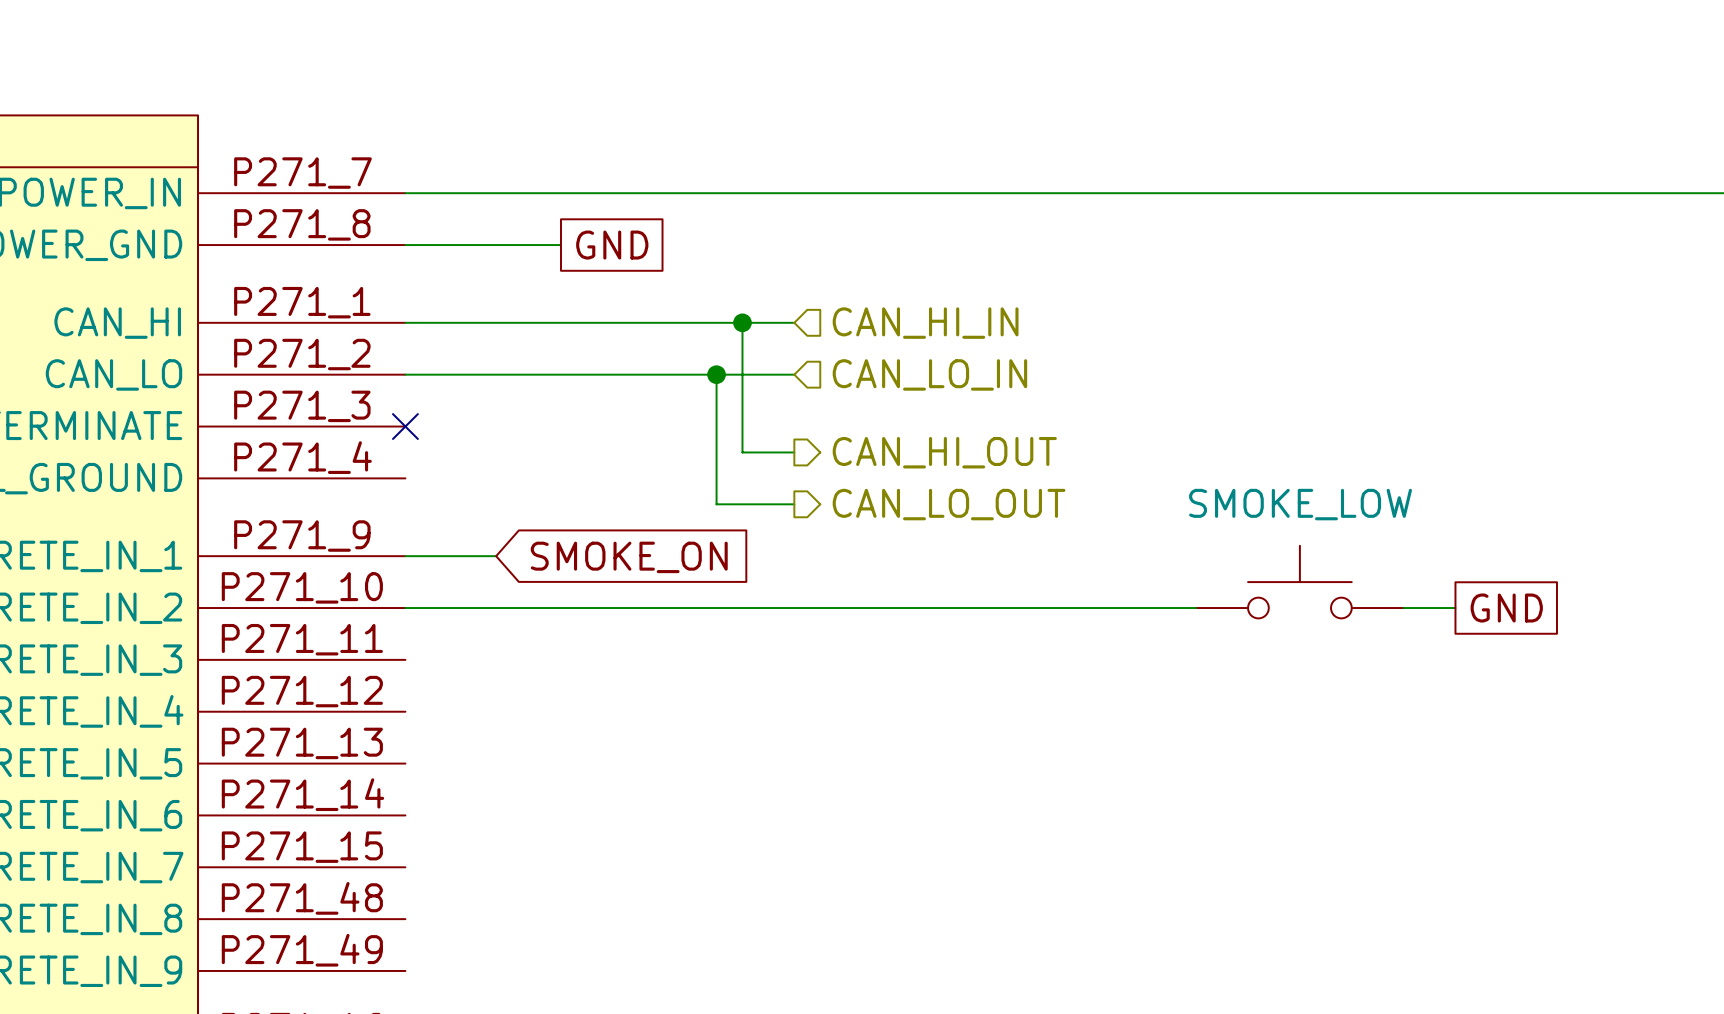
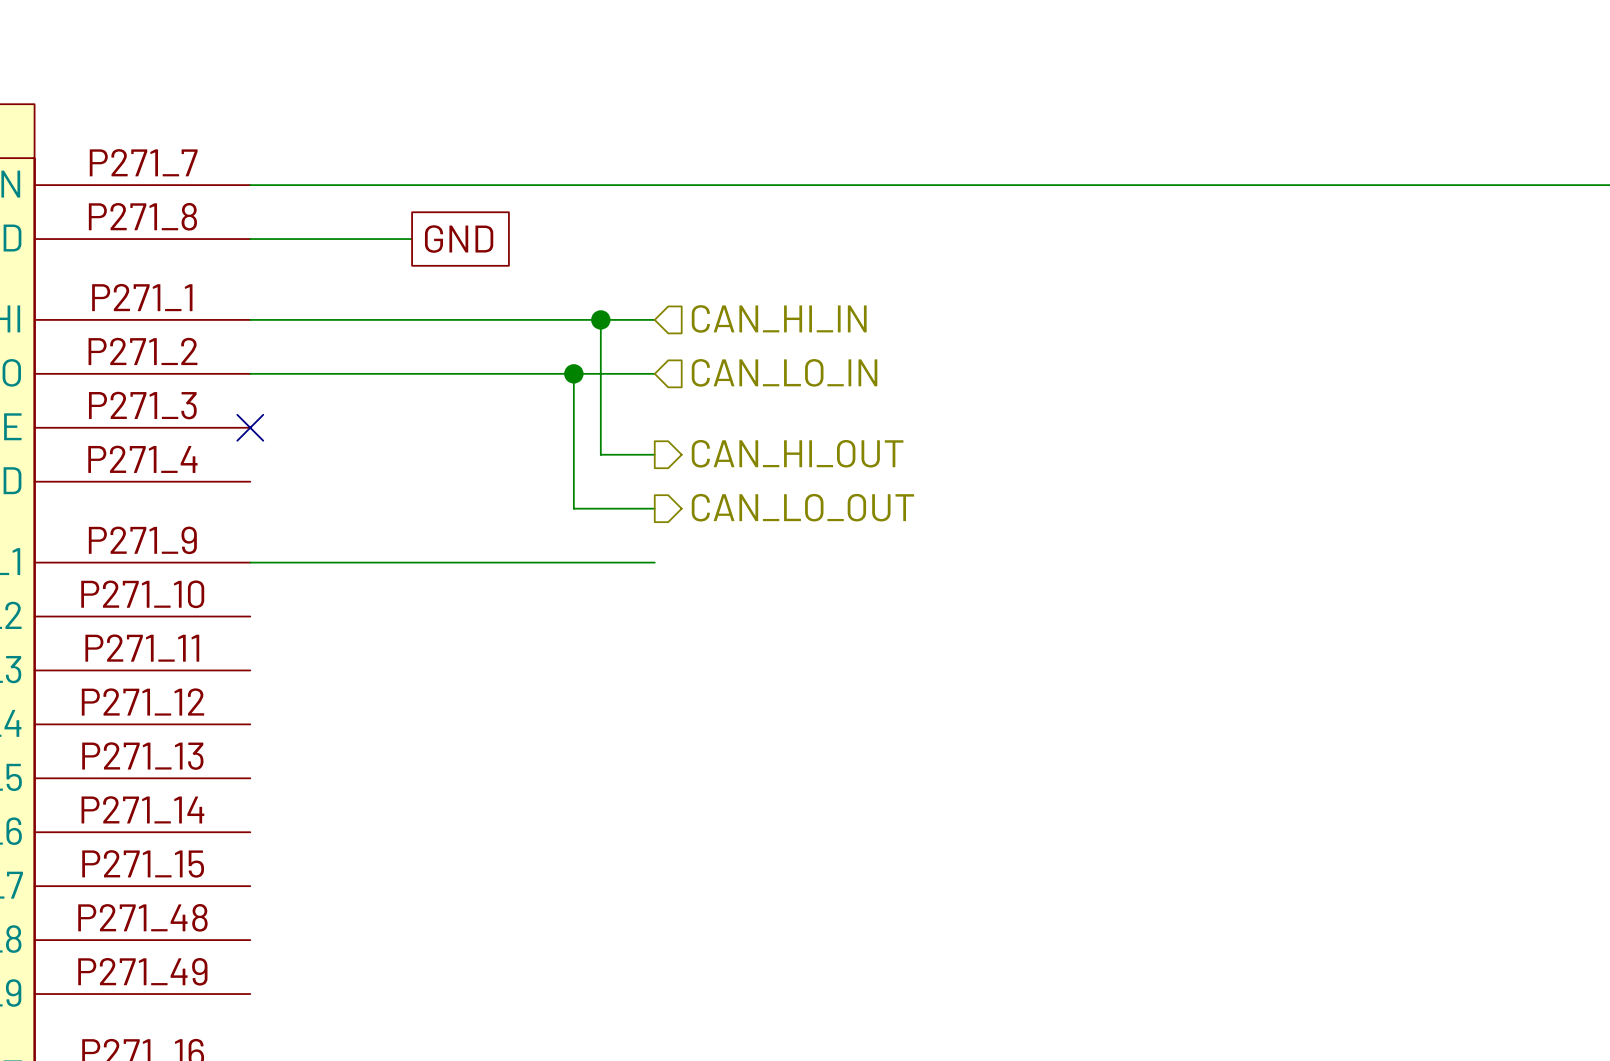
wire: none -> (344, 562) (654, 562)
global label: SMOKE_ON (629, 557) -> none
SMOKE_LOW: (1299, 582) -> none
wire: (405, 608) (1196, 608) -> none
wire: (1403, 608) (1455, 608) -> none
global label: GND (1506, 608) -> none

